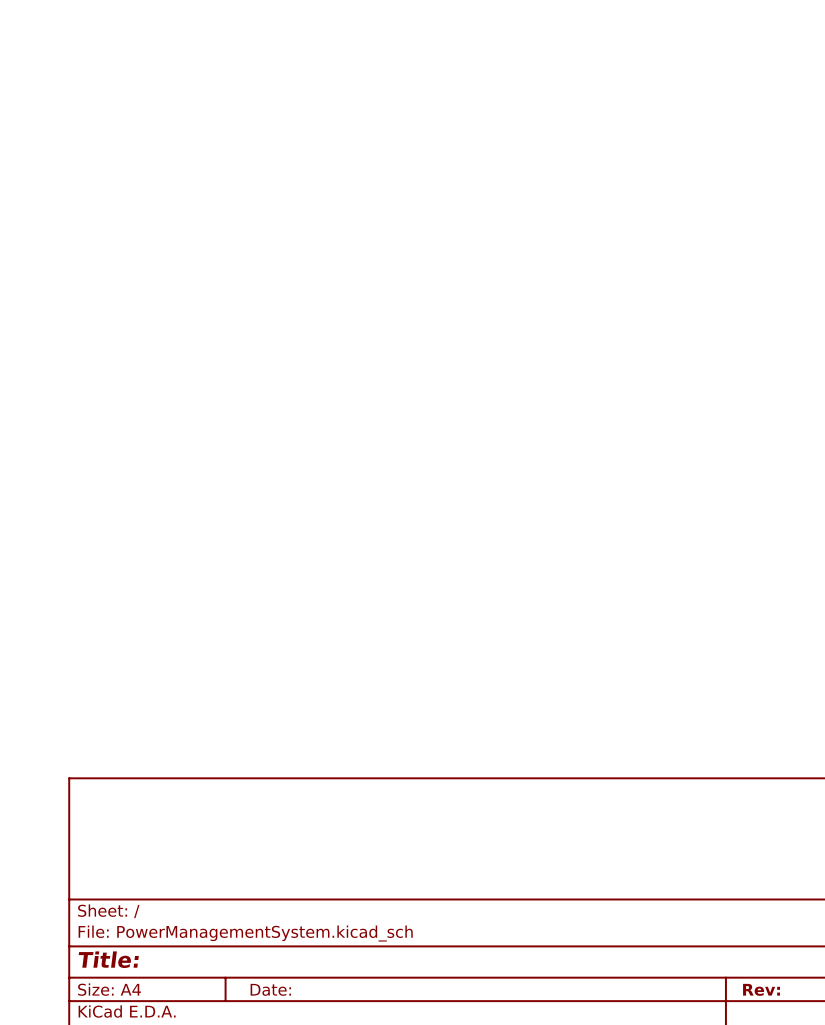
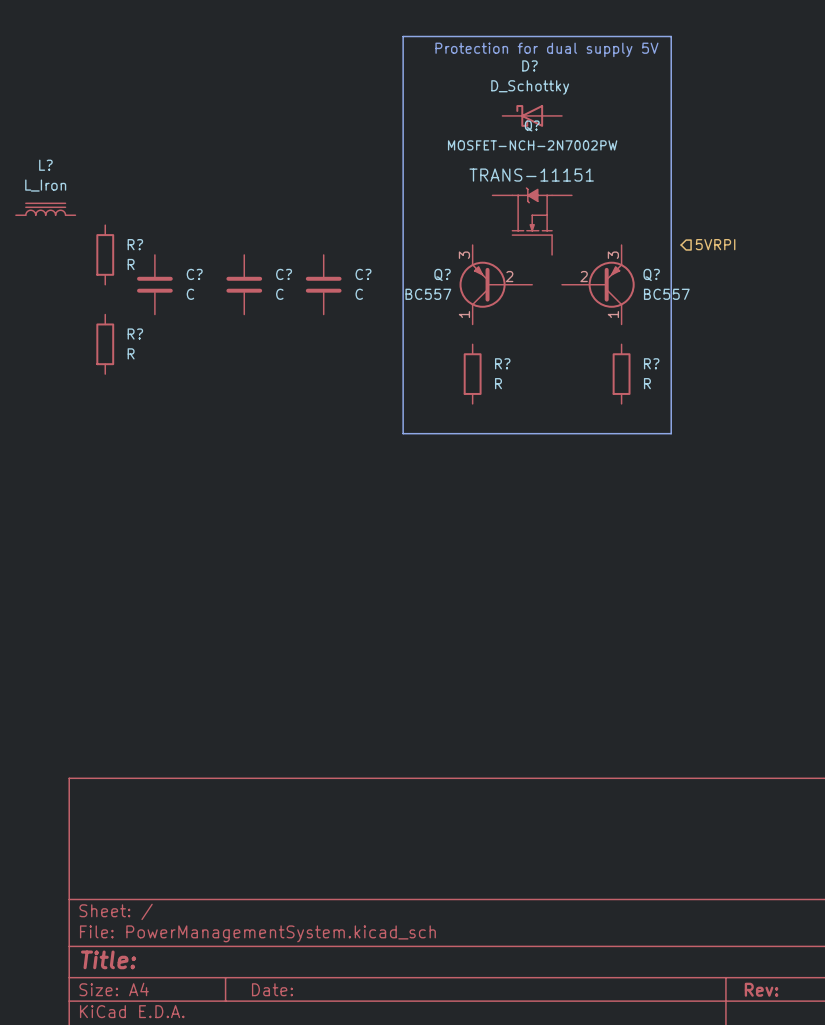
line: none -> (403, 36) (403, 433) (671, 433) (671, 36) (403, 36)
text: none -> Protection for dual supply 5V (546, 49)
D?: none -> D_Schottky (532, 115)
L?: none -> L_Iron (45, 209)
Q?: none -> MOSFET-NCH-2N7002PW (532, 221)
hierarchical label: none -> 5VRPI (715, 244)
R?: none -> R (105, 254)
C?: none -> C (154, 284)
C?: none -> C (244, 284)
C?: none -> C (323, 284)
Q?: none -> BC557 (495, 284)
Q?: none -> BC557 (598, 284)
R?: none -> R (105, 344)
R?: none -> R (472, 374)
R?: none -> R (621, 374)

